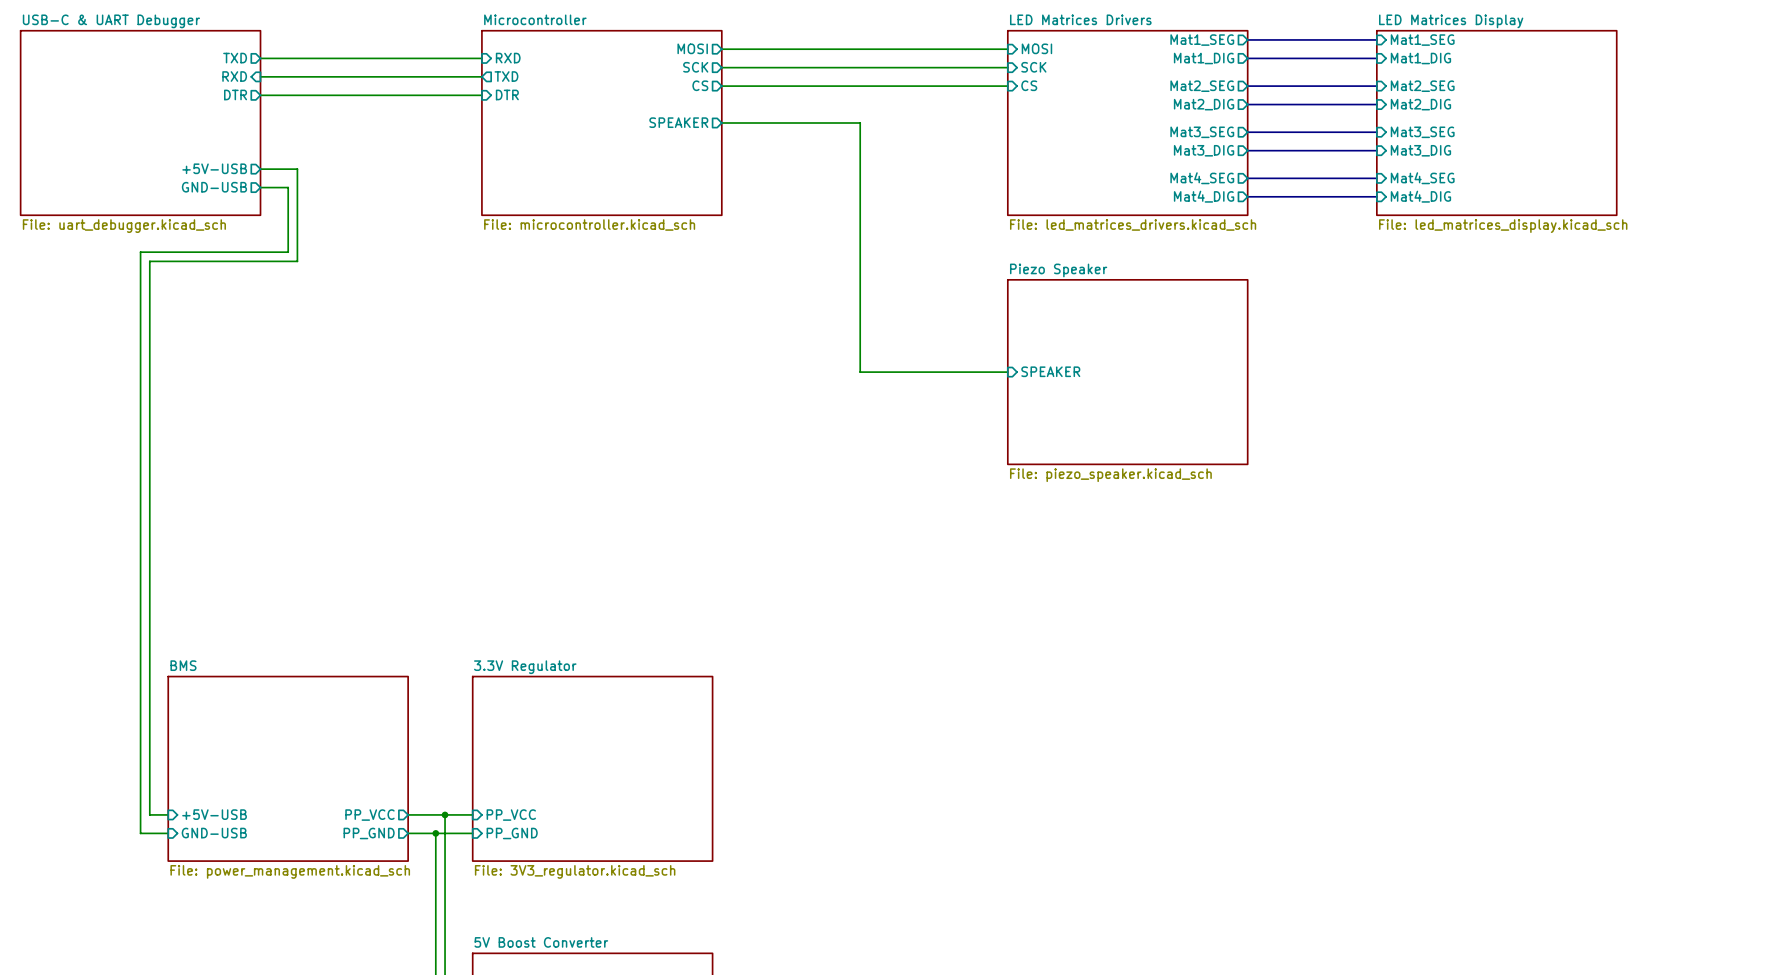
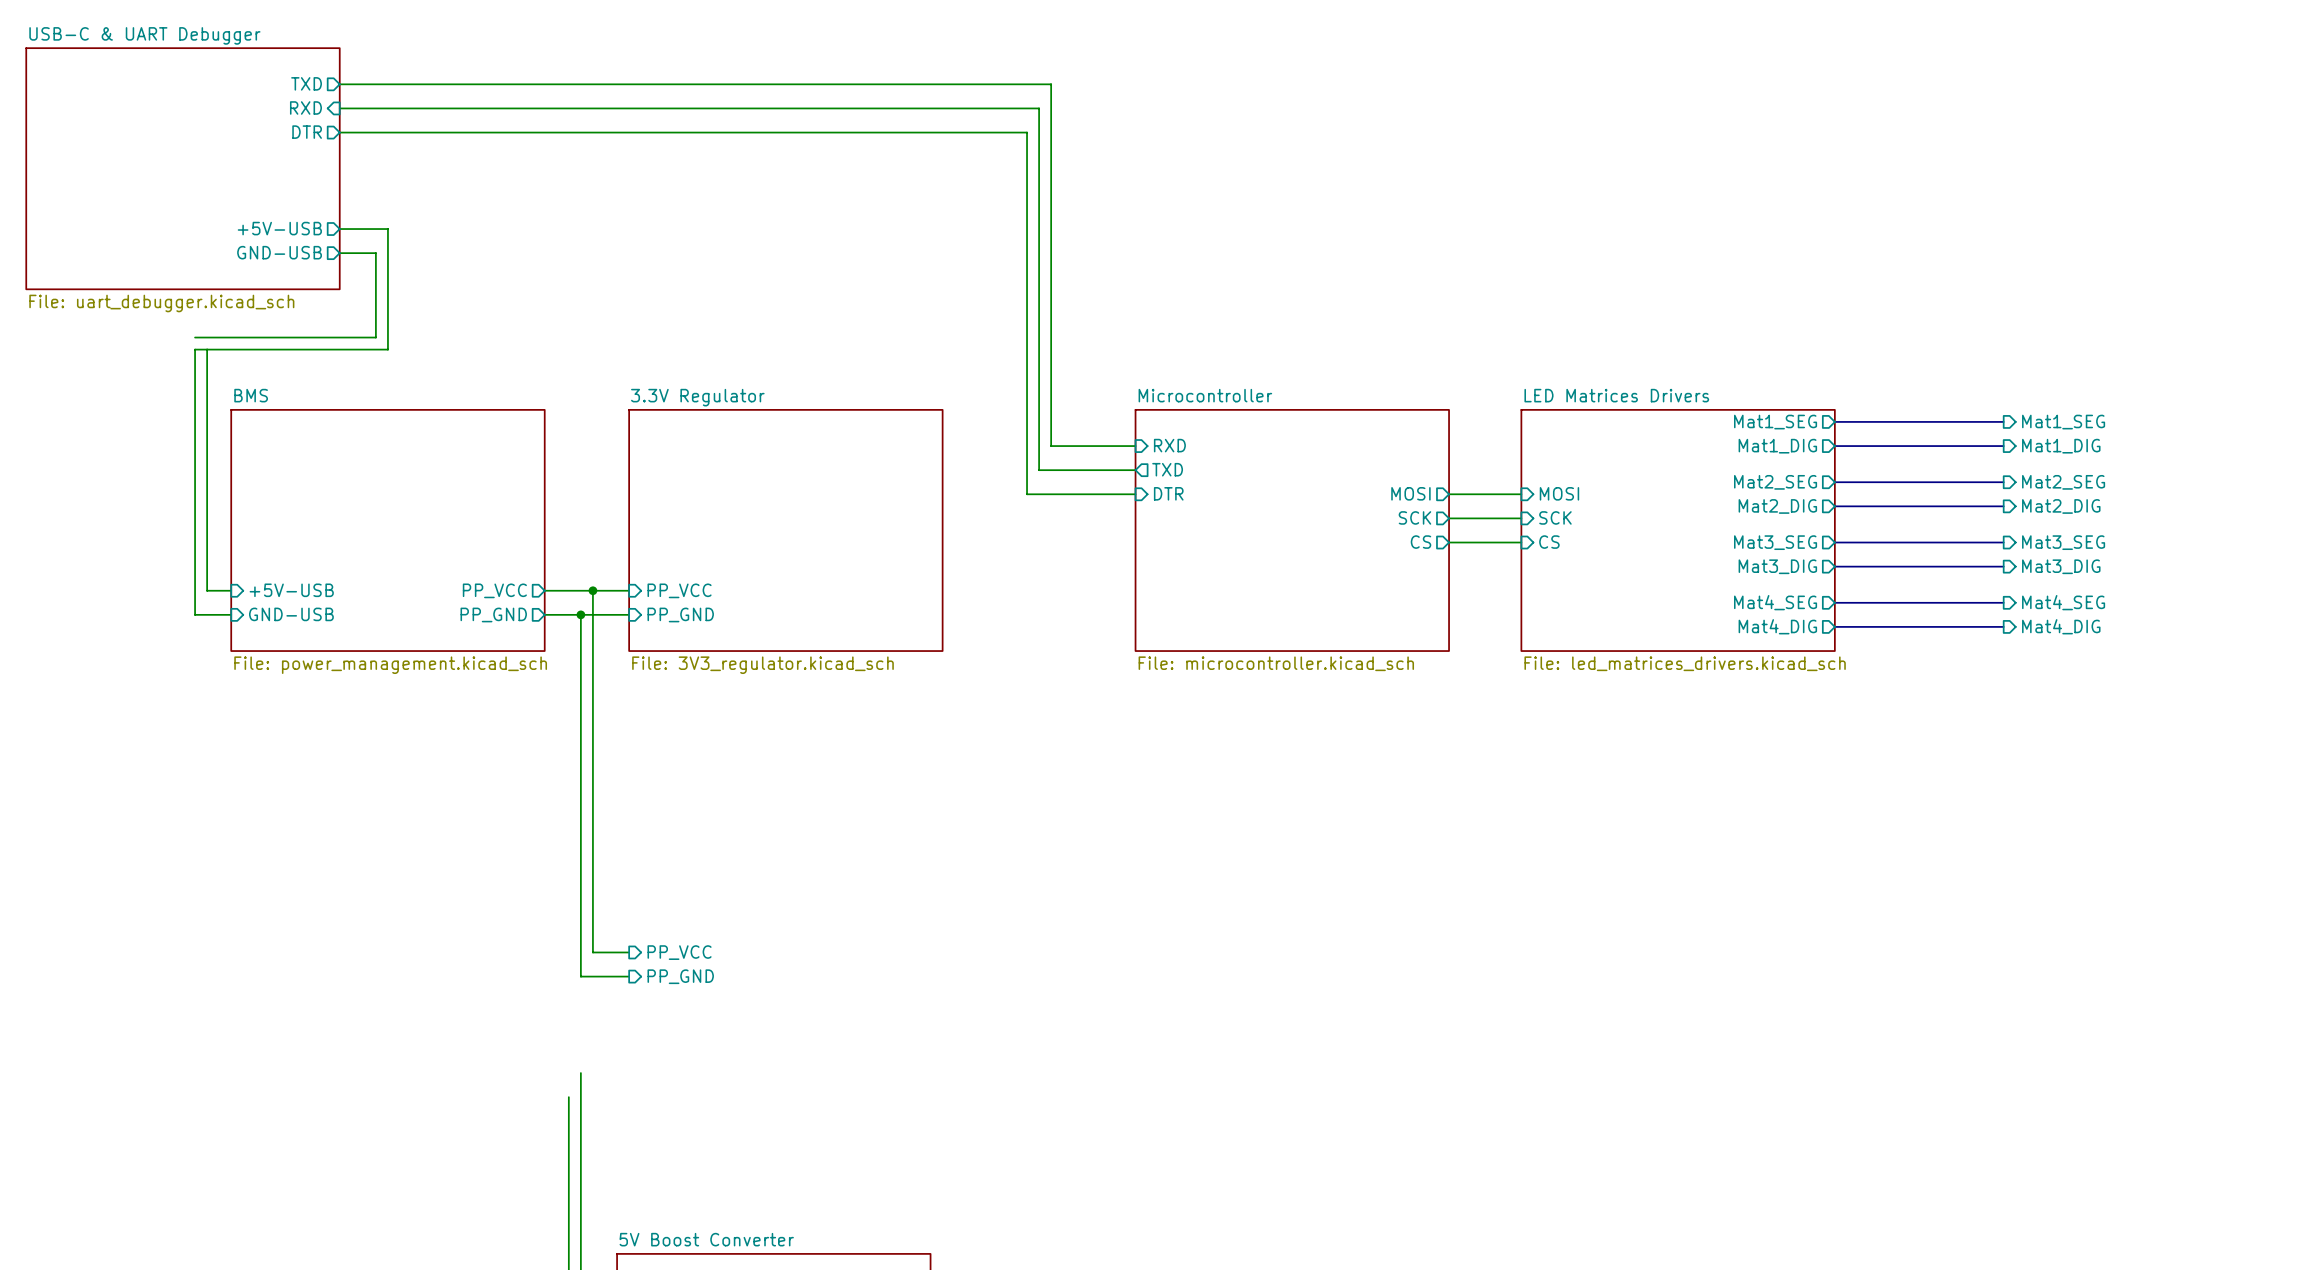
bus: (1247, 39) (1376, 39) -> none
sheet pin: Mat1_SEG (1202, 40) -> none
sheet pin: Mat1_SEG (1422, 40) -> none
sheet pin: MOSI (692, 48) -> none
sheet pin: MOSI (1036, 48) -> none
wire: (721, 49) (1007, 49) -> none
wire: none -> (629, 84) (1051, 84) (1051, 446) (1135, 446)
sheet pin: RXD (508, 58) -> none
sheet pin: Mat1_DIG (1204, 58) -> none
bus: (1247, 58) (1376, 58) -> none
sheet pin: Mat1_DIG (1420, 58) -> none
sheet pin: SCK (695, 67) -> none
wire: (721, 67) (1007, 67) -> none
sheet pin: SCK (1033, 67) -> none
wire: none -> (629, 108) (1039, 108) (1039, 470) (1135, 470)
sheet pin: TXD (506, 76) -> none
sheet pin: CS (700, 85) -> none
sheet pin: CS (1029, 85) -> none
wire: (721, 86) (1007, 86) -> none
sheet pin: Mat2_SEG (1202, 86) -> none
bus: (1247, 86) (1376, 86) -> none
sheet pin: Mat2_SEG (1422, 86) -> none
sheet pin: DTR (507, 94) -> none
sheet pin: Mat2_DIG (1204, 104) -> none
bus: (1247, 104) (1376, 104) -> none
sheet pin: Mat2_DIG (1420, 104) -> none
sheet pin: SPEAKER (678, 122) -> none
sheet Microcontroller: File: microcontroller.kicad_sch (601, 123) -> none
wire: (721, 123) (860, 123) (860, 372) -> (629, 132) (1027, 132) (1027, 494) (1123, 494)
sheet LED Matrices Drivers: File: led_matrices_drivers.kicad_sch (1127, 123) -> none
sheet LED Matrices Display: File: led_matrices_display.kicad_sch (1496, 123) -> none
sheet pin: Mat3_SEG (1202, 132) -> none
bus: (1247, 132) (1376, 132) -> none
sheet pin: Mat3_SEG (1422, 132) -> none
sheet pin: Mat3_DIG (1204, 150) -> none
bus: (1247, 150) (1376, 150) -> none
sheet pin: Mat3_DIG (1420, 150) -> none
sheet pin: Mat4_SEG (1202, 178) -> none
bus: (1247, 178) (1376, 178) -> none
sheet pin: Mat4_SEG (1422, 178) -> none
sheet pin: Mat4_DIG (1204, 196) -> none
bus: (1247, 196) (1376, 196) -> none
sheet pin: Mat4_DIG (1420, 196) -> none
wire: (149, 252) (140, 252) (140, 833) (168, 833) -> none
wire: none -> (207, 349) (207, 590) (231, 590)
sheet pin: none -> Mat1_SEG (1775, 422)
bus: none -> (1834, 421) (2003, 421)
sheet pin: none -> Mat1_SEG (2063, 422)
sheet pin: none -> RXD (1169, 445)
sheet pin: none -> Mat1_DIG (1777, 446)
bus: none -> (1834, 446) (2003, 446)
sheet pin: none -> Mat1_DIG (2061, 446)
sheet pin: none -> TXD (1167, 469)
sheet pin: none -> Mat2_SEG (1775, 482)
bus: none -> (1834, 482) (2003, 482)
sheet pin: none -> Mat2_SEG (2063, 482)
sheet pin: none -> DTR (1168, 493)
sheet pin: SPEAKER (1050, 371) -> none
sheet pin: none -> MOSI (1410, 493)
sheet pin: none -> MOSI (1559, 493)
wire: (869, 372) (1007, 372) -> none
wire: none -> (1449, 494) (1521, 494)
sheet Piezo Speaker: File: piezo_speaker.kicad_sch (1127, 372) -> none
sheet pin: none -> Mat2_DIG (1777, 506)
bus: none -> (1834, 506) (2003, 506)
sheet pin: none -> Mat2_DIG (2061, 506)
sheet pin: none -> SCK (1414, 517)
wire: none -> (1449, 518) (1521, 518)
sheet pin: none -> SCK (1555, 517)
sheet BMS: none -> File: power_management.kicad_sch (387, 530)
sheet Microcontroller: none -> File: microcontroller.kicad_sch (1292, 530)
sheet LED Matrices Drivers: none -> File: led_matrices_drivers.kicad_sch (1678, 530)
sheet pin: none -> CS (1421, 542)
sheet pin: none -> CS (1549, 542)
wire: none -> (1449, 542) (1521, 542)
sheet pin: none -> Mat3_SEG (1775, 542)
bus: none -> (1834, 542) (2003, 542)
sheet pin: none -> Mat3_SEG (2063, 542)
sheet pin: none -> Mat3_DIG (1777, 566)
bus: none -> (1834, 566) (2003, 566)
sheet pin: none -> Mat3_DIG (2061, 566)
sheet pin: none -> +5V-USB (291, 590)
wire: none -> (544, 590) (629, 590)
wire: none -> (592, 590) (592, 952) (629, 952)
junction: none -> (592, 590)
sheet pin: none -> PP_VCC (494, 590)
sheet pin: none -> PP_VCC (679, 590)
sheet pin: none -> Mat4_SEG (1775, 602)
bus: none -> (1834, 602) (2003, 602)
sheet pin: none -> Mat4_SEG (2063, 602)
wire: (149, 464) (149, 814) (168, 814) -> (195, 614) (231, 614)
sheet pin: none -> GND-USB (291, 614)
sheet pin: none -> PP_GND (493, 614)
wire: none -> (544, 614) (629, 614)
wire: none -> (580, 614) (580, 976) (629, 976)
junction: none -> (580, 614)
sheet pin: none -> PP_GND (680, 614)
sheet pin: none -> Mat4_DIG (1777, 626)
bus: none -> (1834, 626) (2003, 626)
sheet pin: none -> Mat4_DIG (2061, 626)
sheet pin: none -> PP_VCC (679, 952)
sheet pin: none -> PP_GND (680, 976)
sheet BMS: File: power_management.kicad_sch (288, 768) -> none
sheet 3.3V Regulator position: (592, 768) -> (785, 530)
sheet pin: +5V-USB (214, 814) -> none
wire: (408, 814) (472, 814) -> none
junction: (445, 814) -> none
sheet pin: PP_VCC (369, 815) -> none
sheet pin: PP_VCC (511, 815) -> none
sheet pin: GND-USB (214, 833) -> none
sheet pin: PP_GND (369, 833) -> none
wire: (408, 833) (472, 833) -> none
junction: (435, 833) -> none
sheet pin: PP_GND (512, 833) -> none

